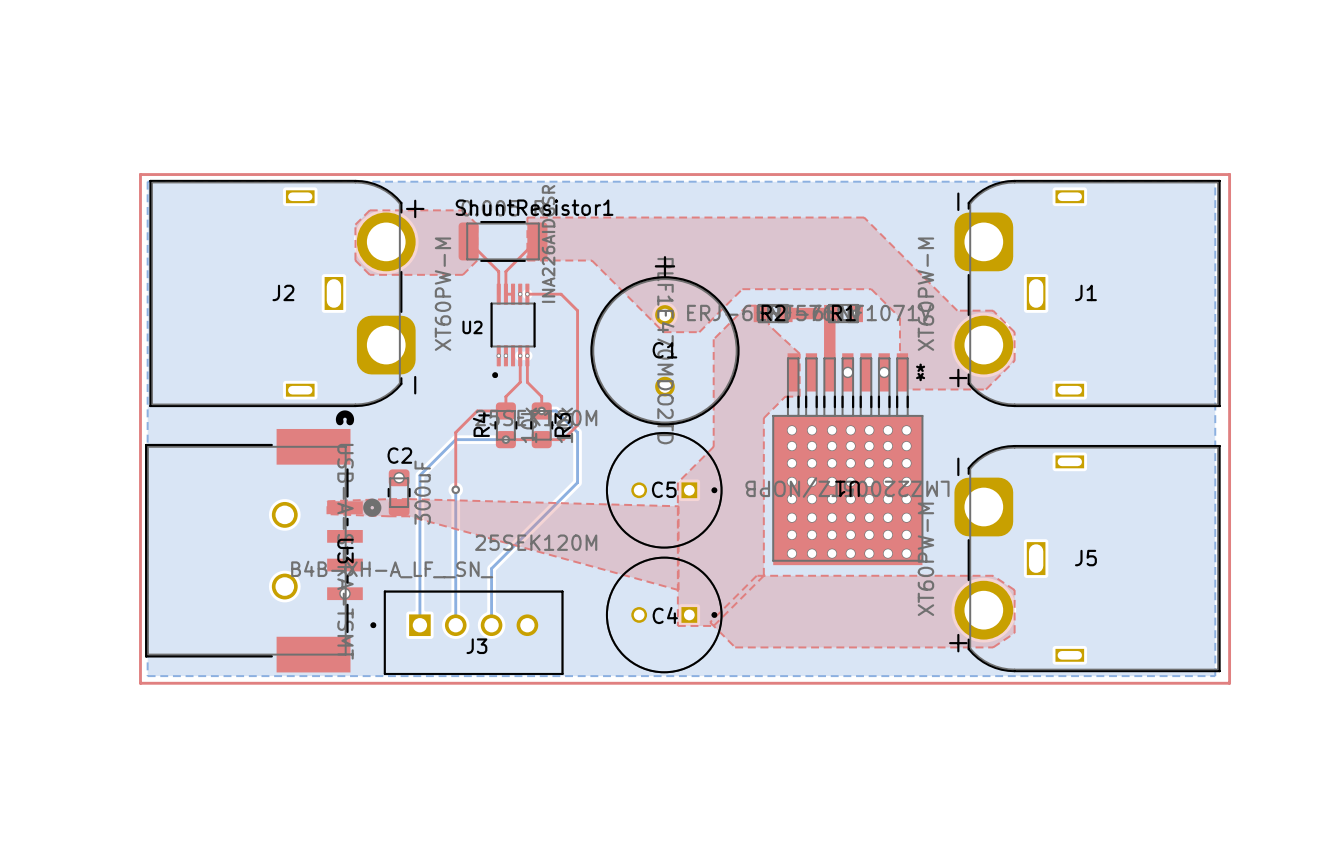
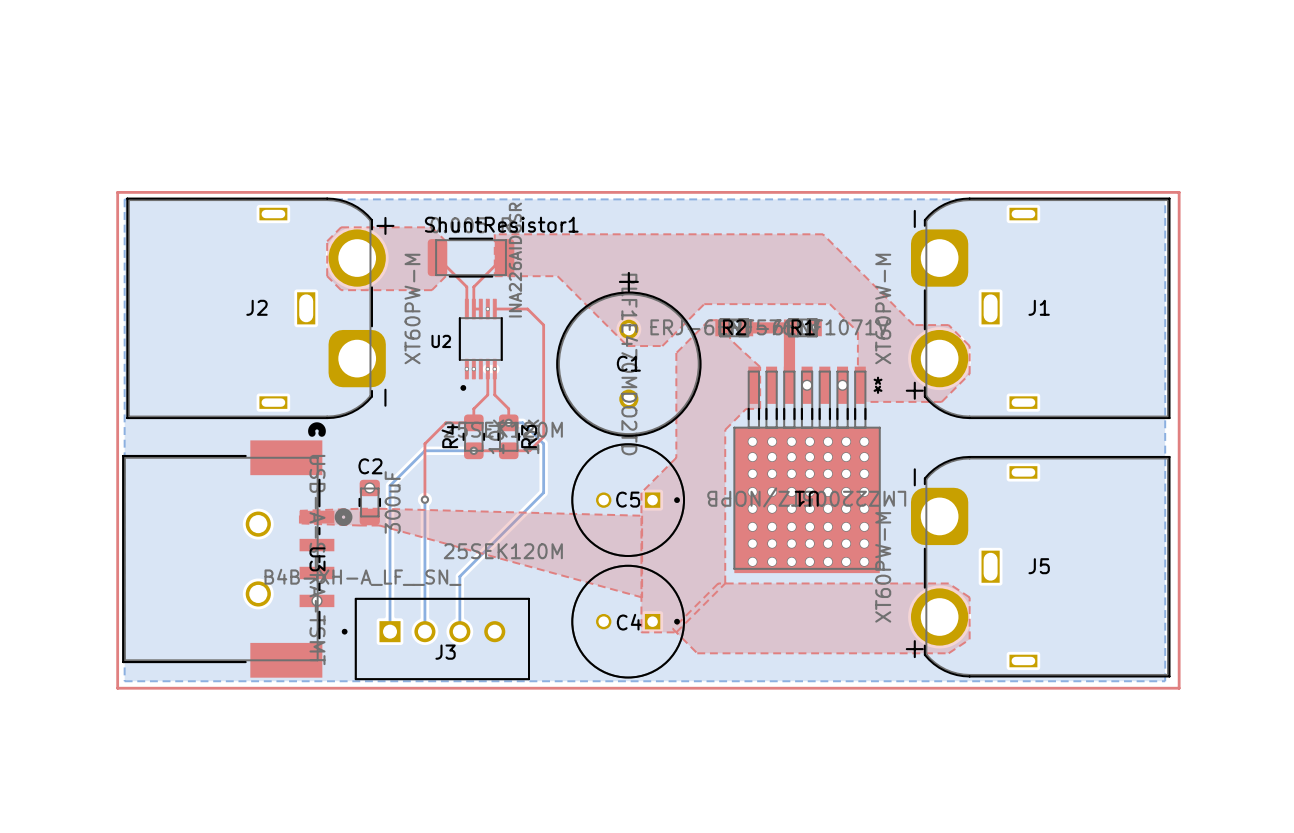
via: (527, 294) -> none

